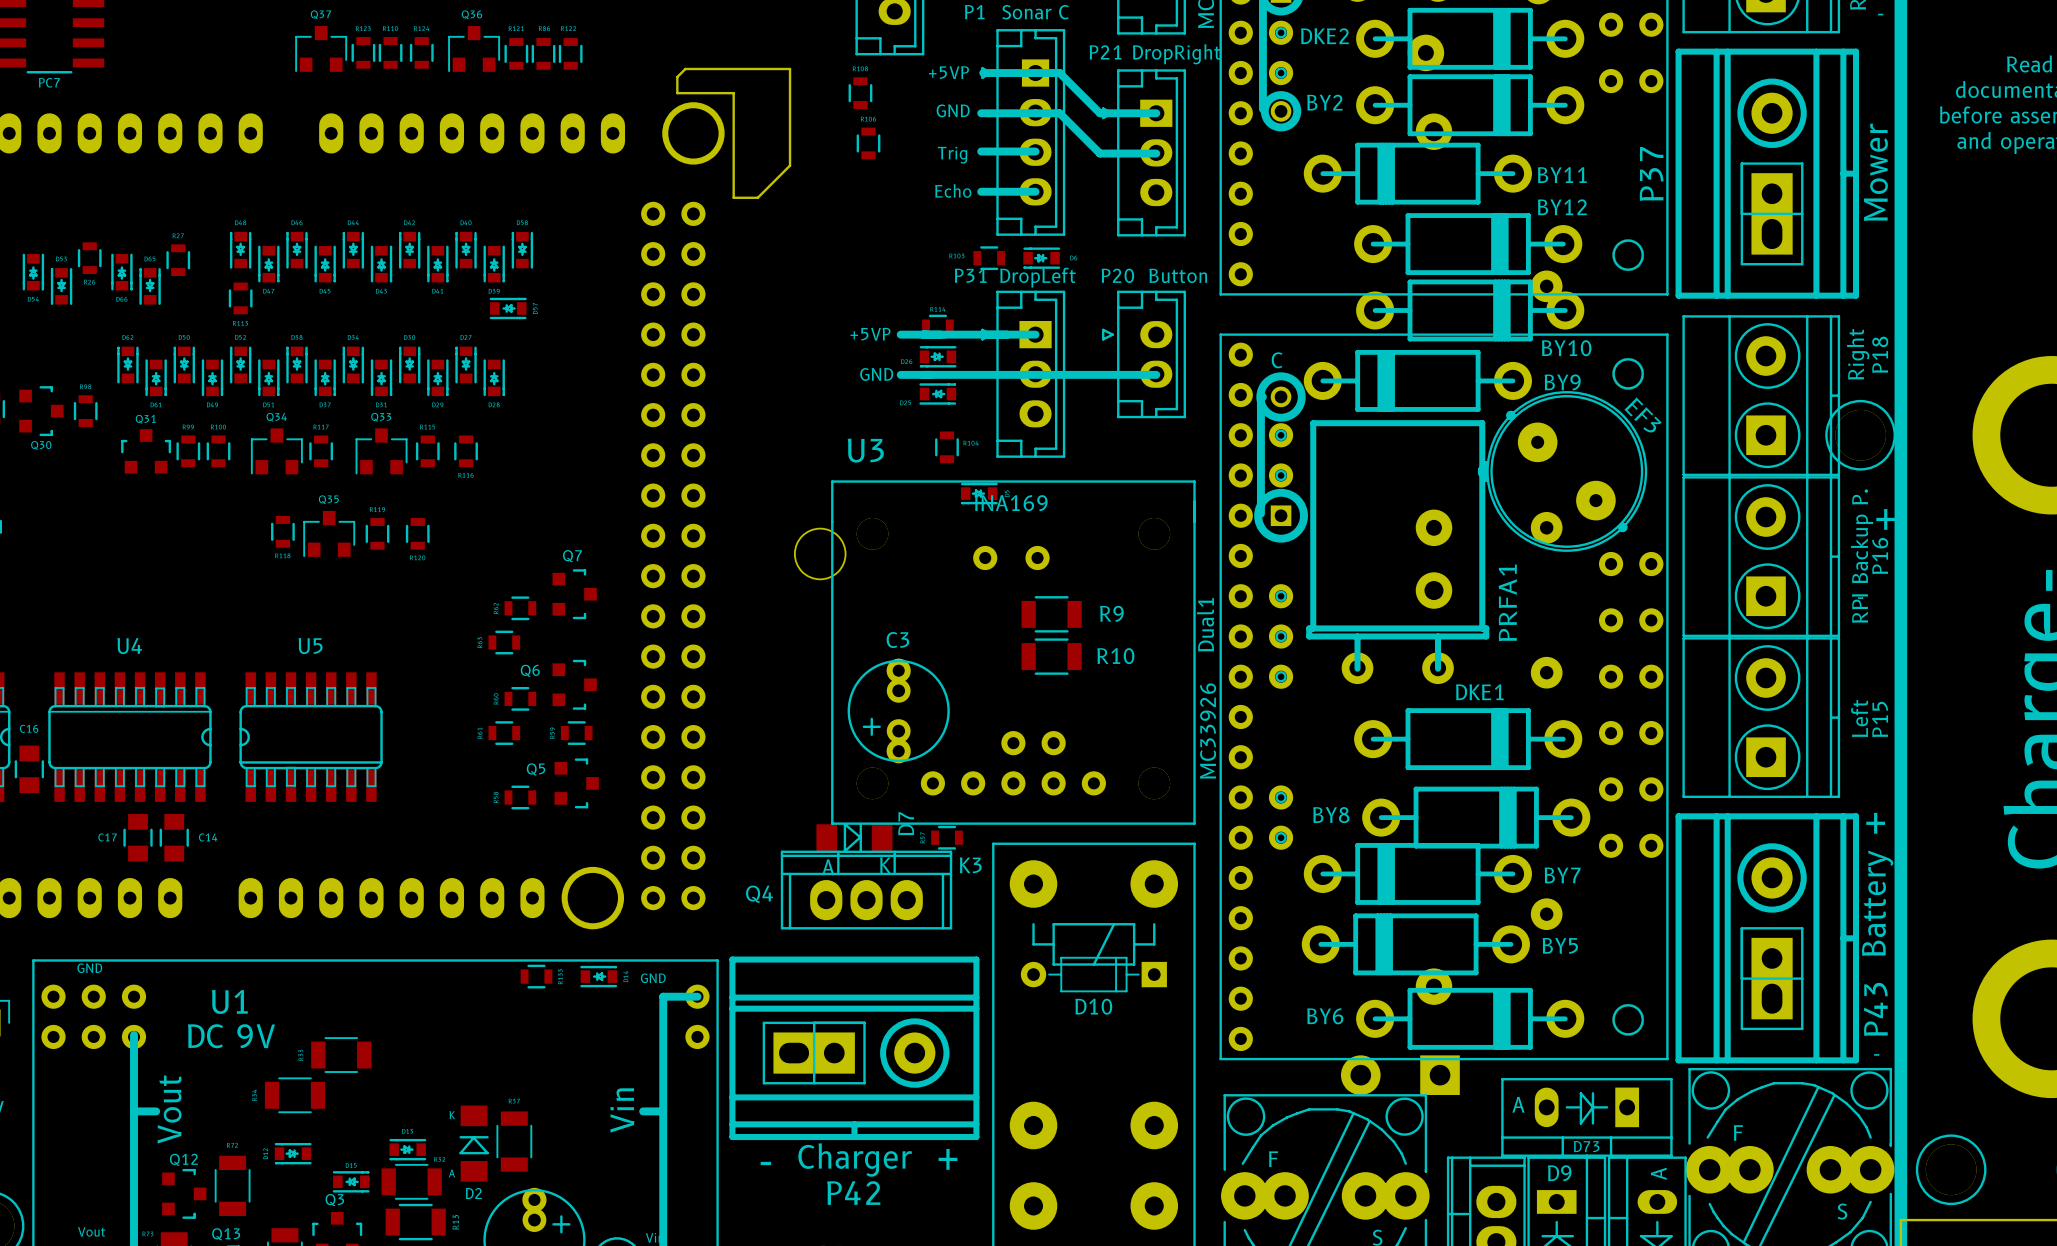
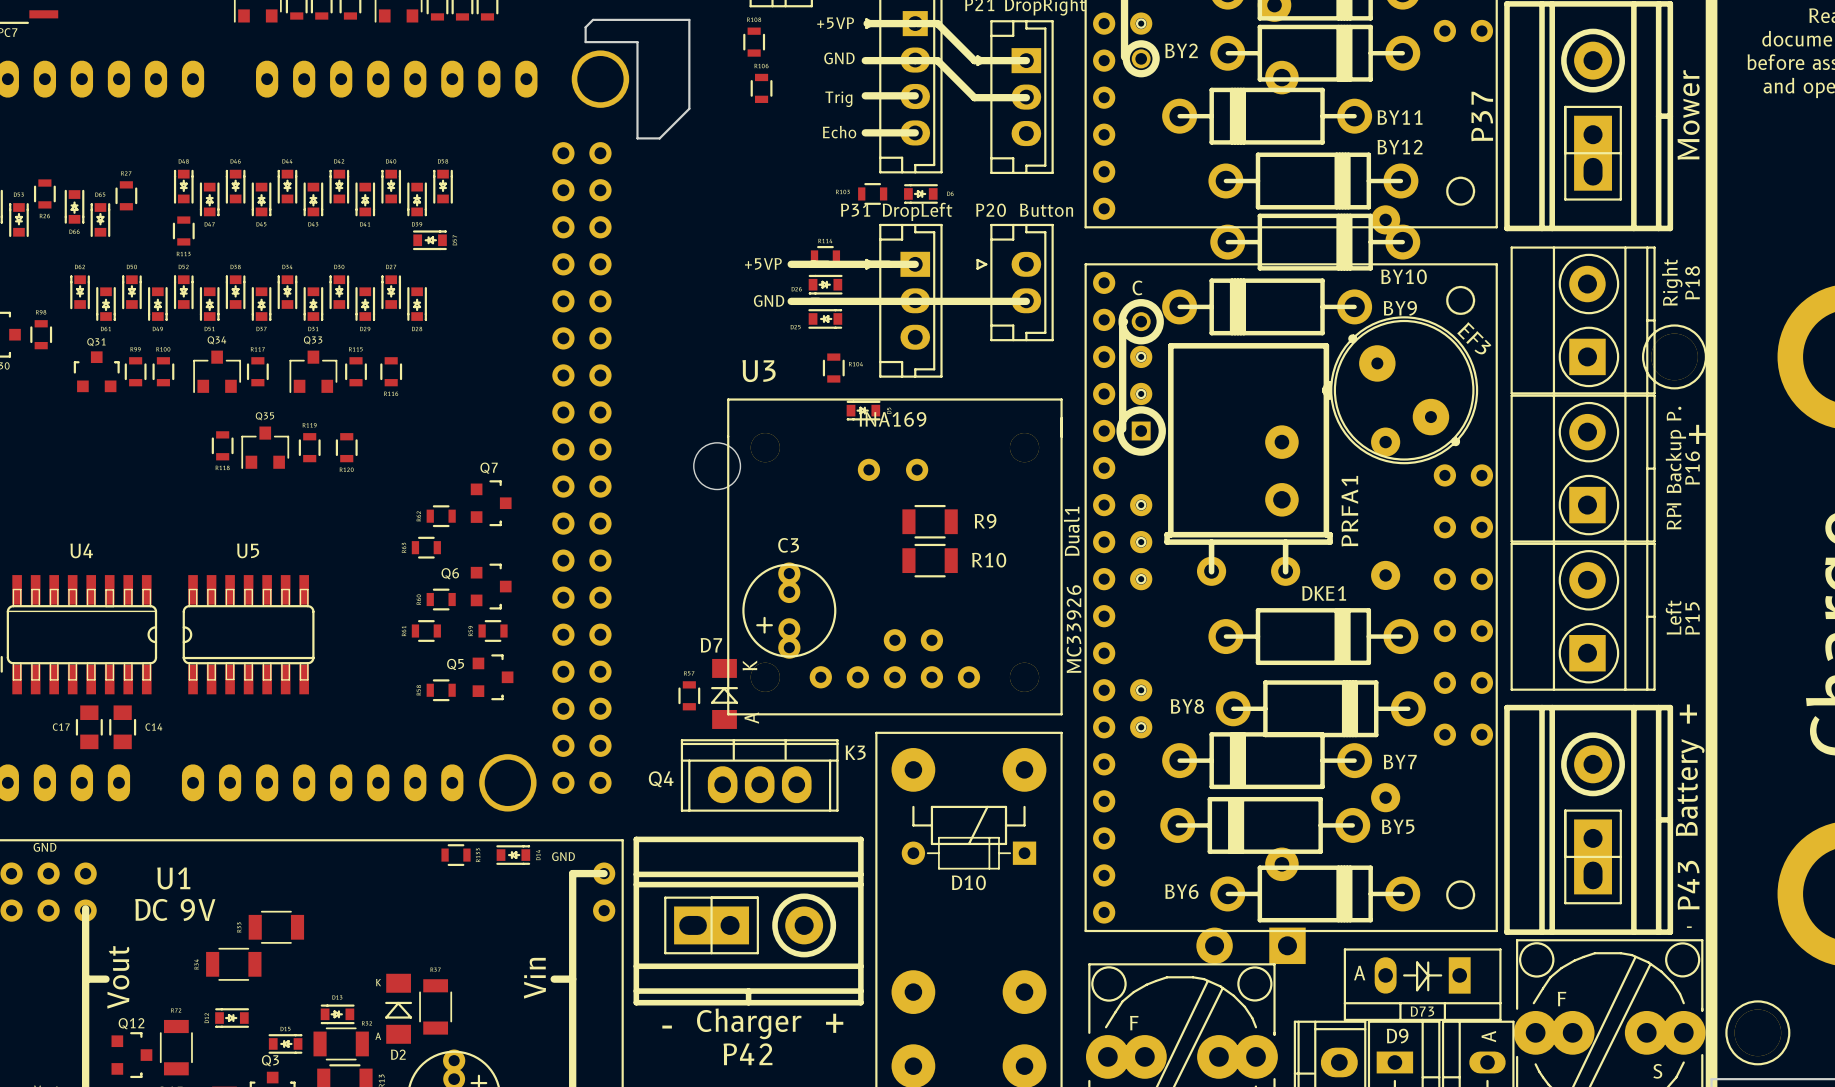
D7 rotation: 0° (854, 837) -> 90° counterclockwise (724, 693)
part rotation: 0° (946, 837) -> 90° clockwise (689, 695)
part position: (946, 837) -> (689, 695)

